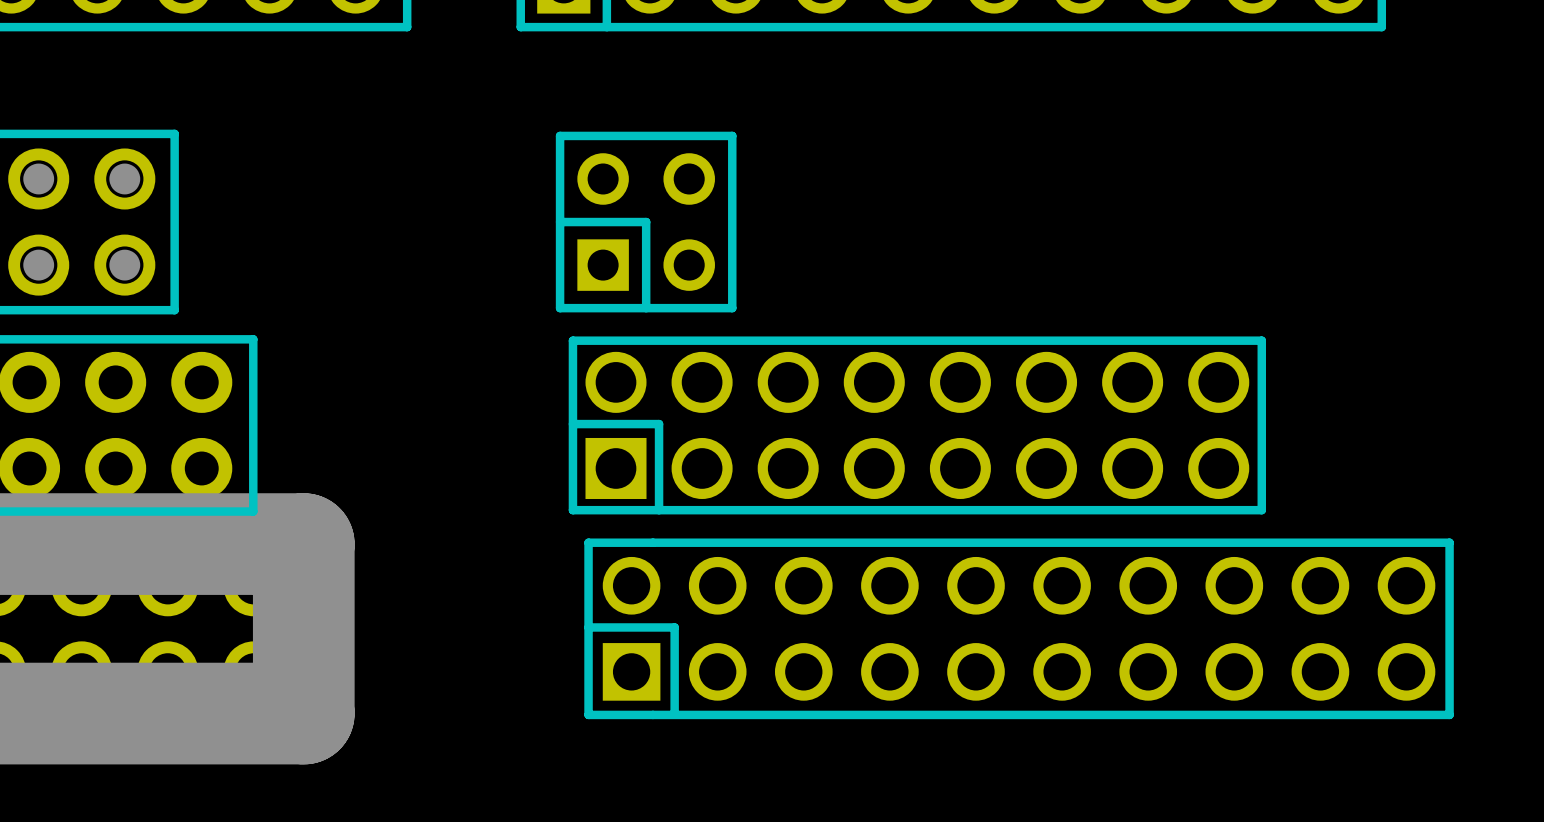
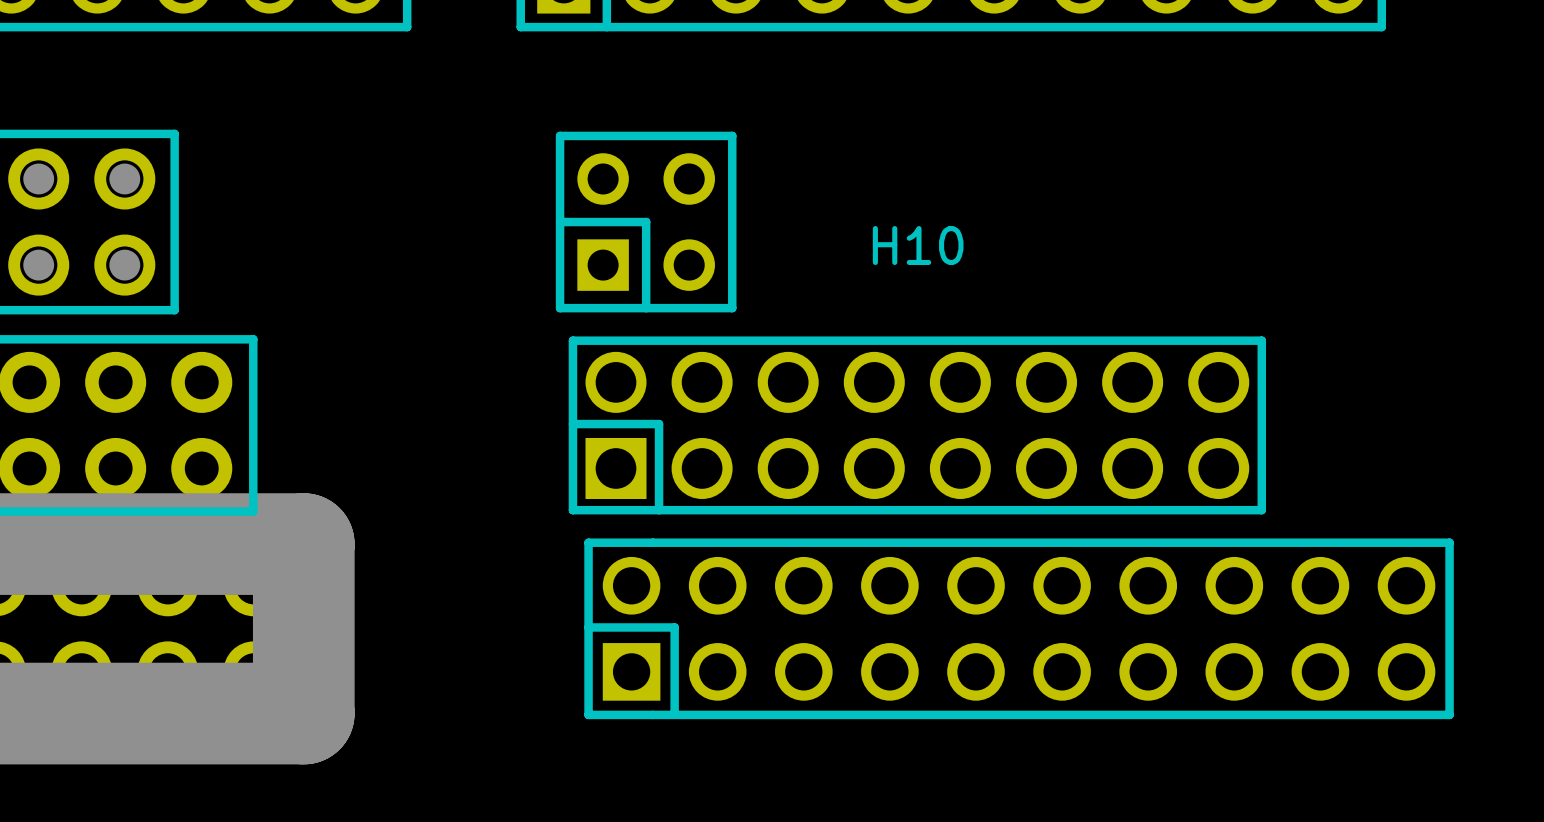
H10 name: none -> H10 (918, 245)

